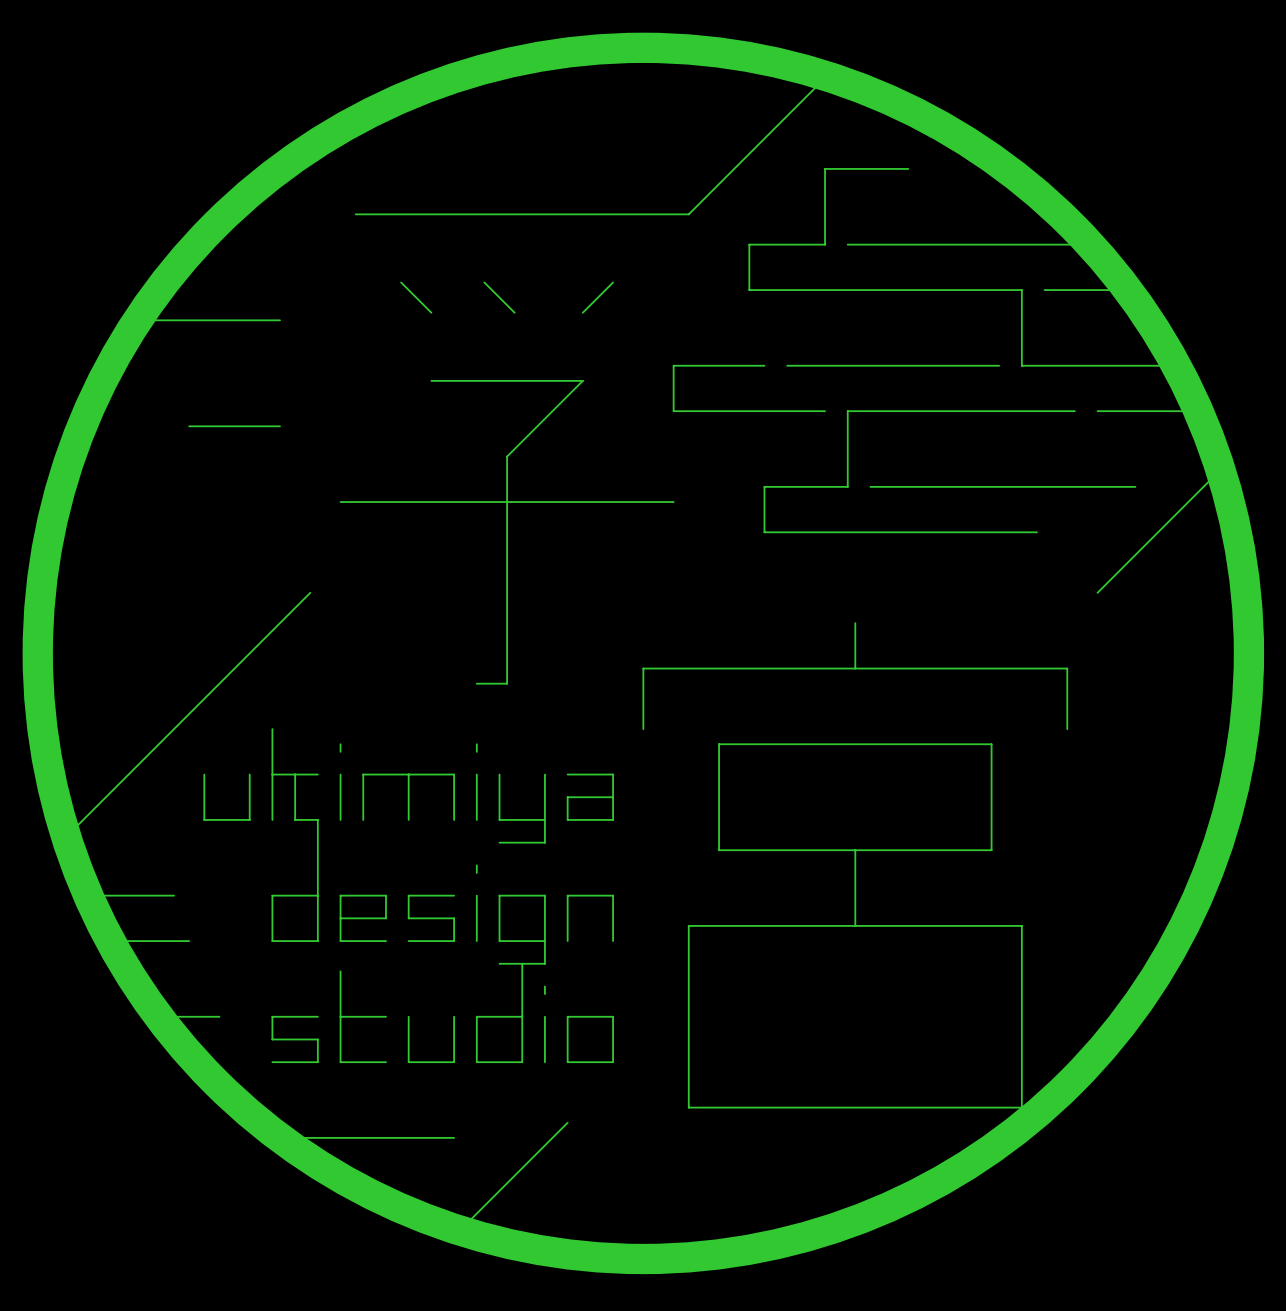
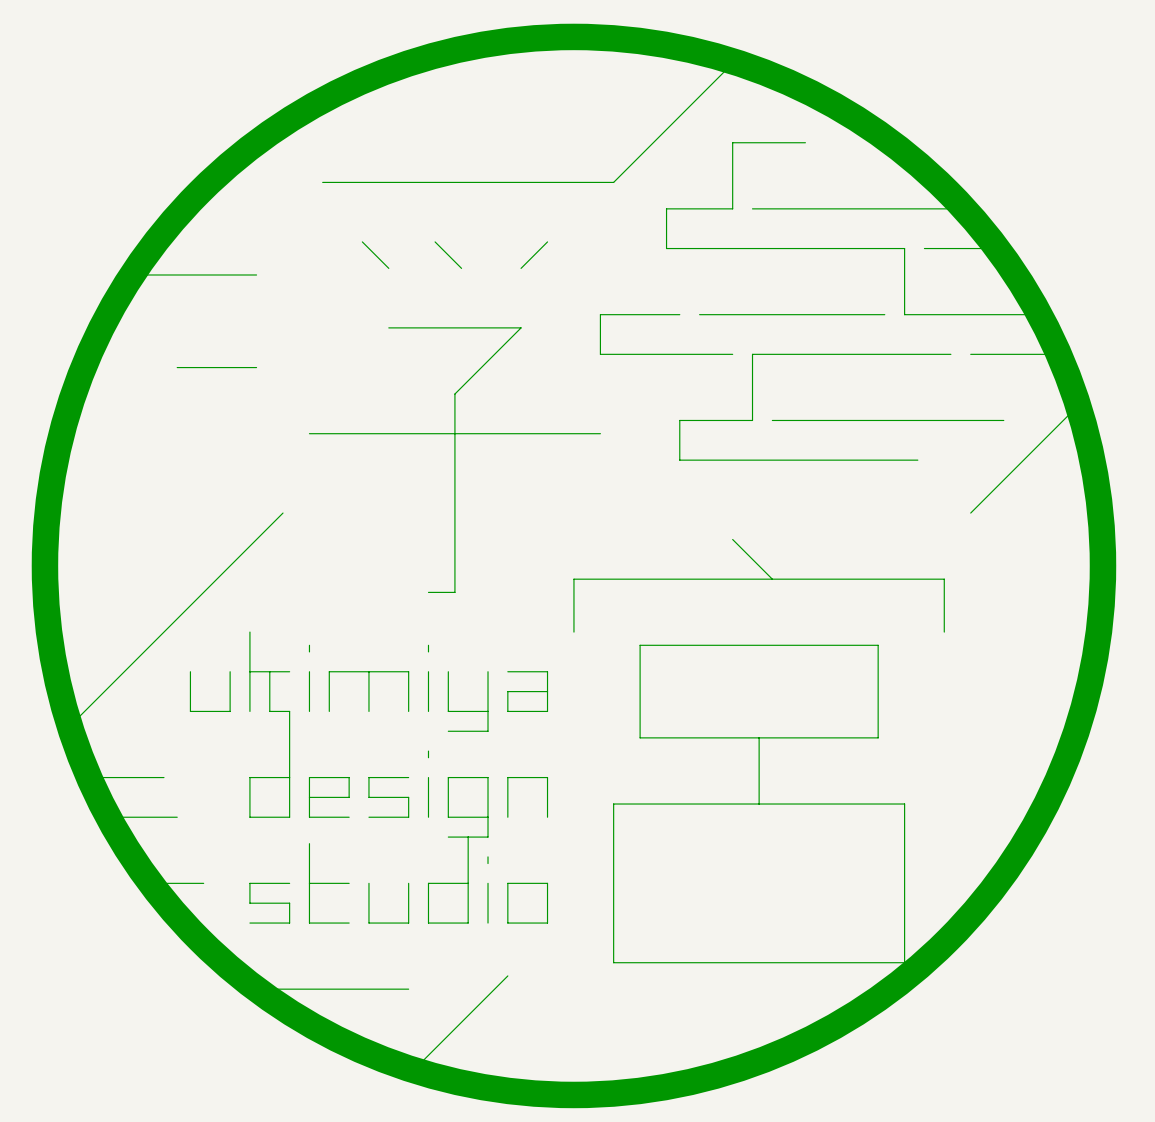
wire: none -> (732, 539) (772, 579)
wire: (855, 623) (855, 668) -> none

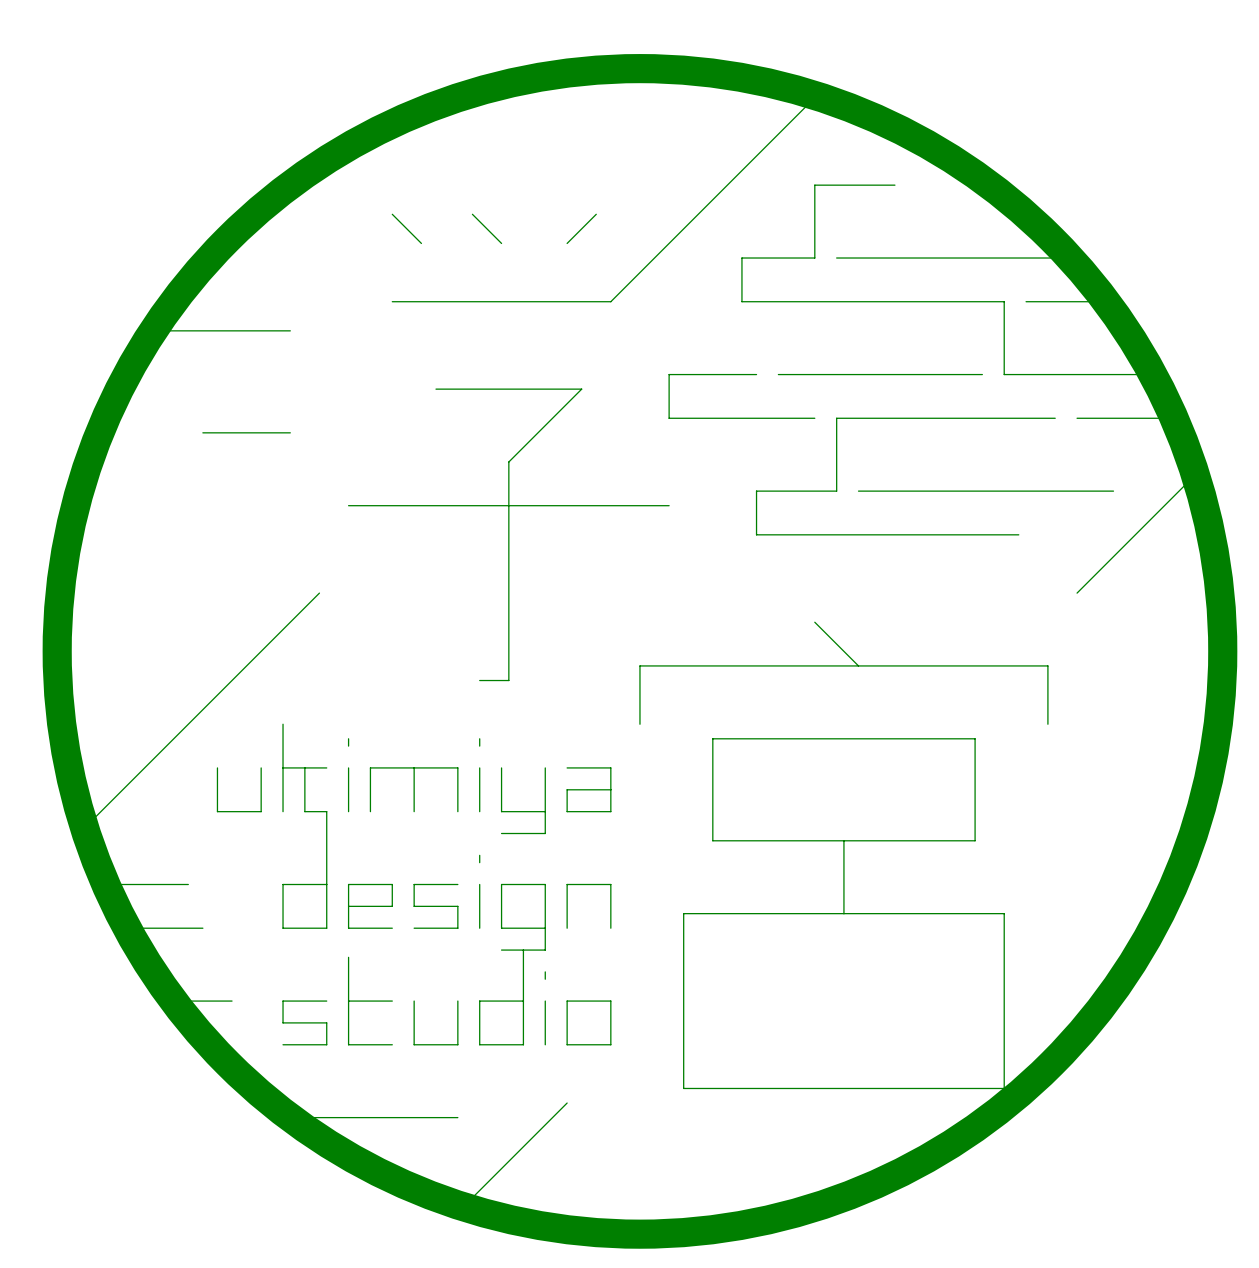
wire: (322, 182) (613, 182) -> (392, 301) (610, 301) (683, 228)
wire: (362, 241) (388, 268) -> (392, 214) (421, 243)
wire: (435, 241) (461, 268) -> (472, 214) (501, 243)
wire: (547, 241) (521, 268) -> (596, 214) (567, 243)

